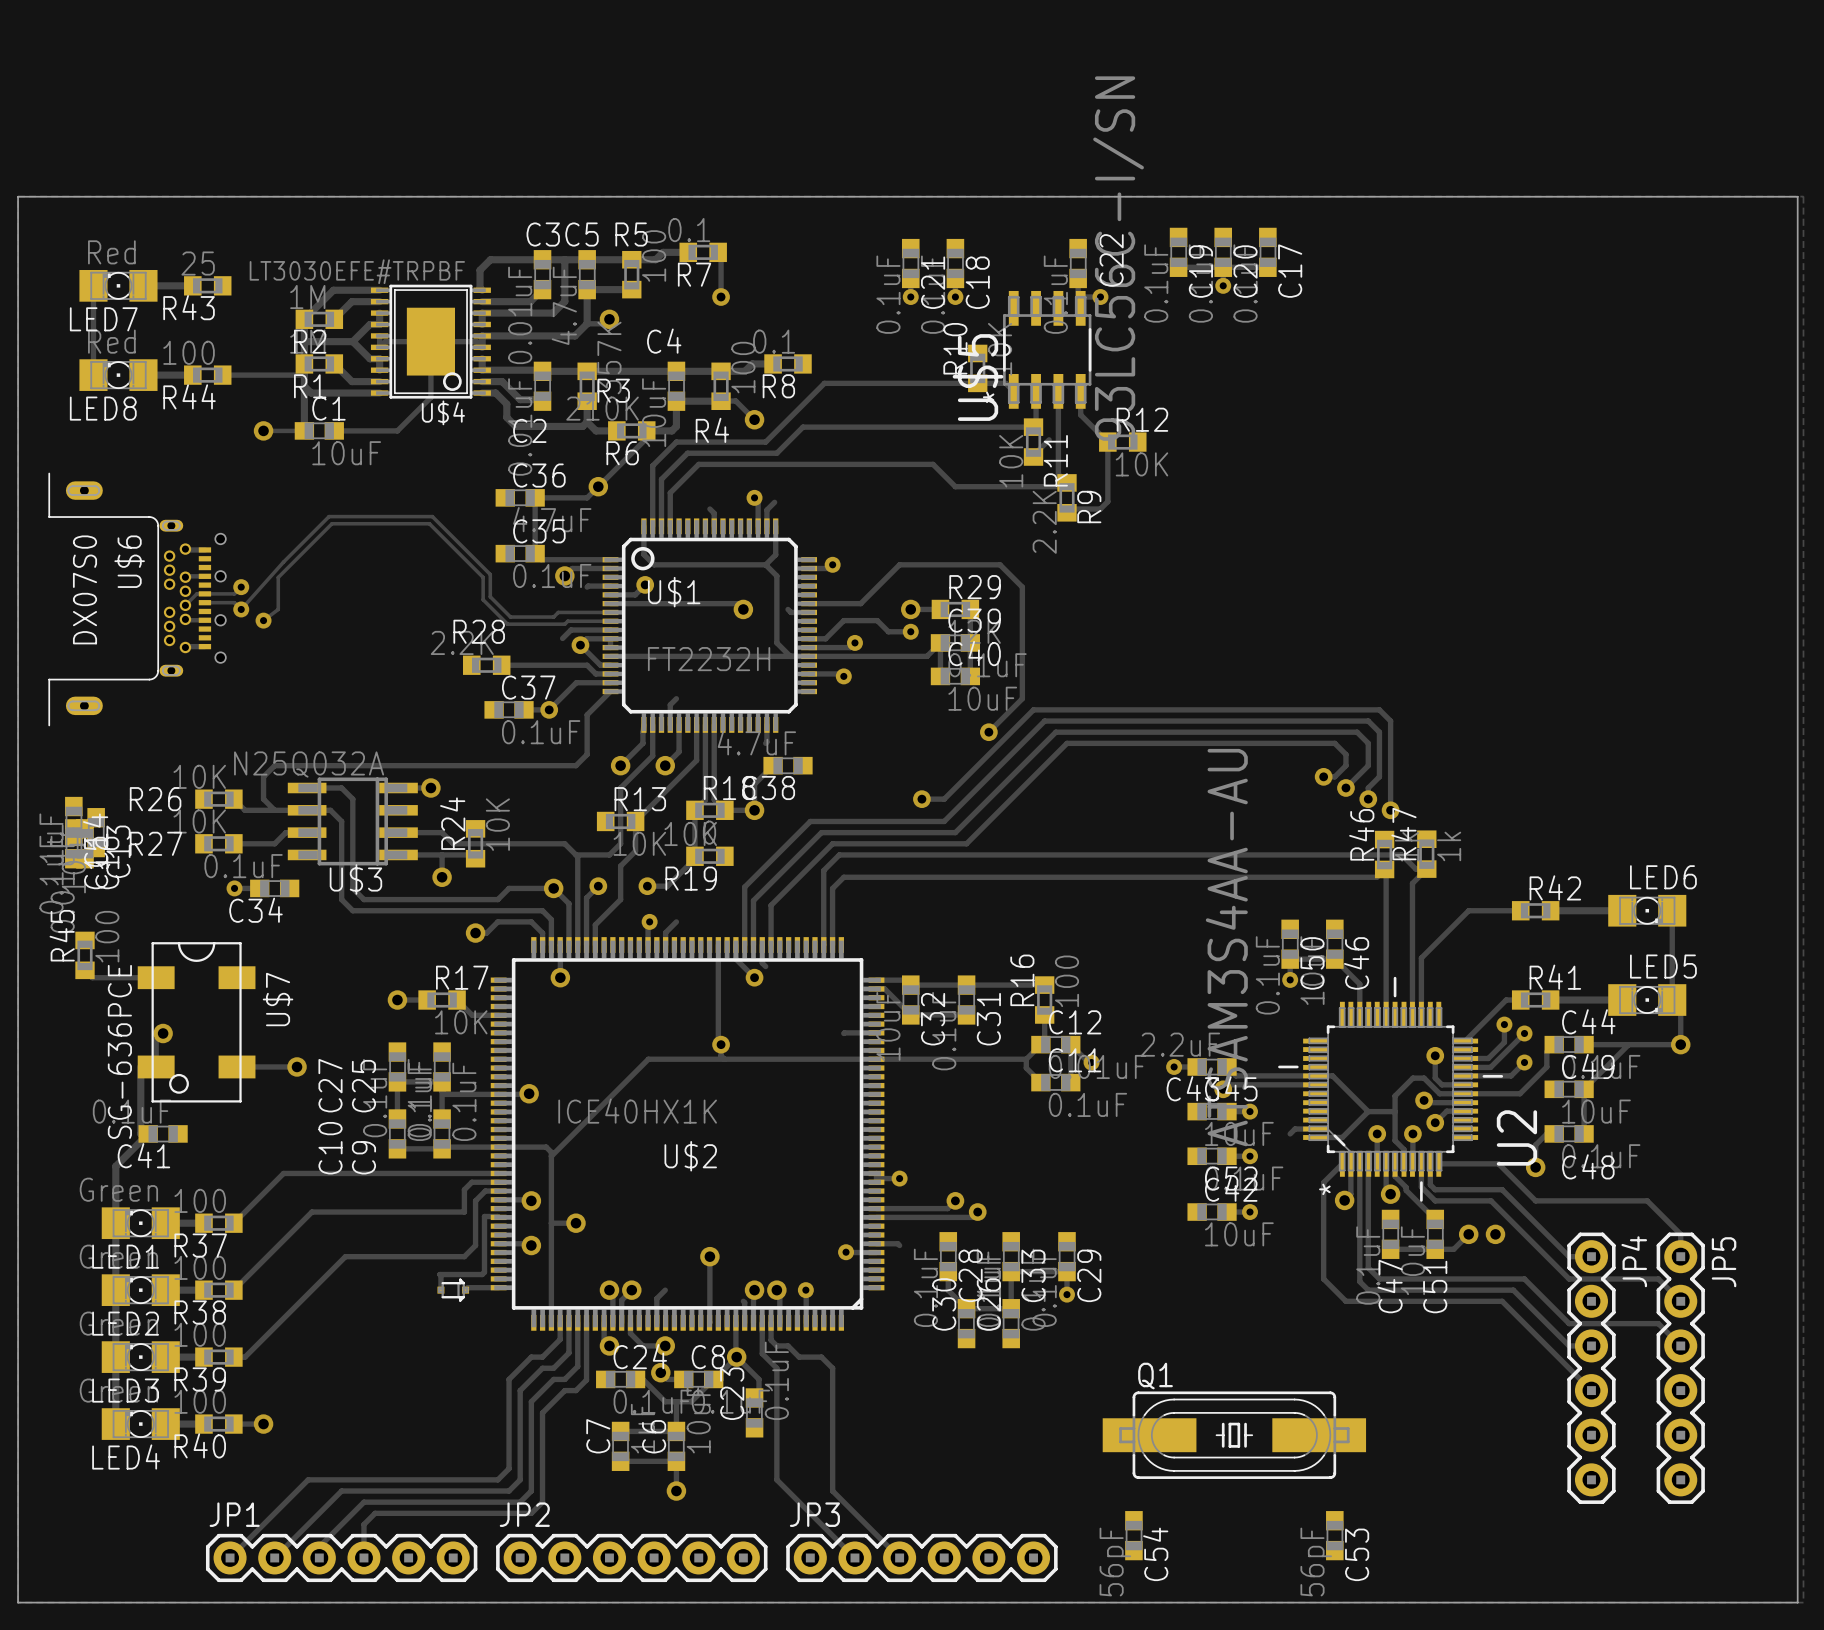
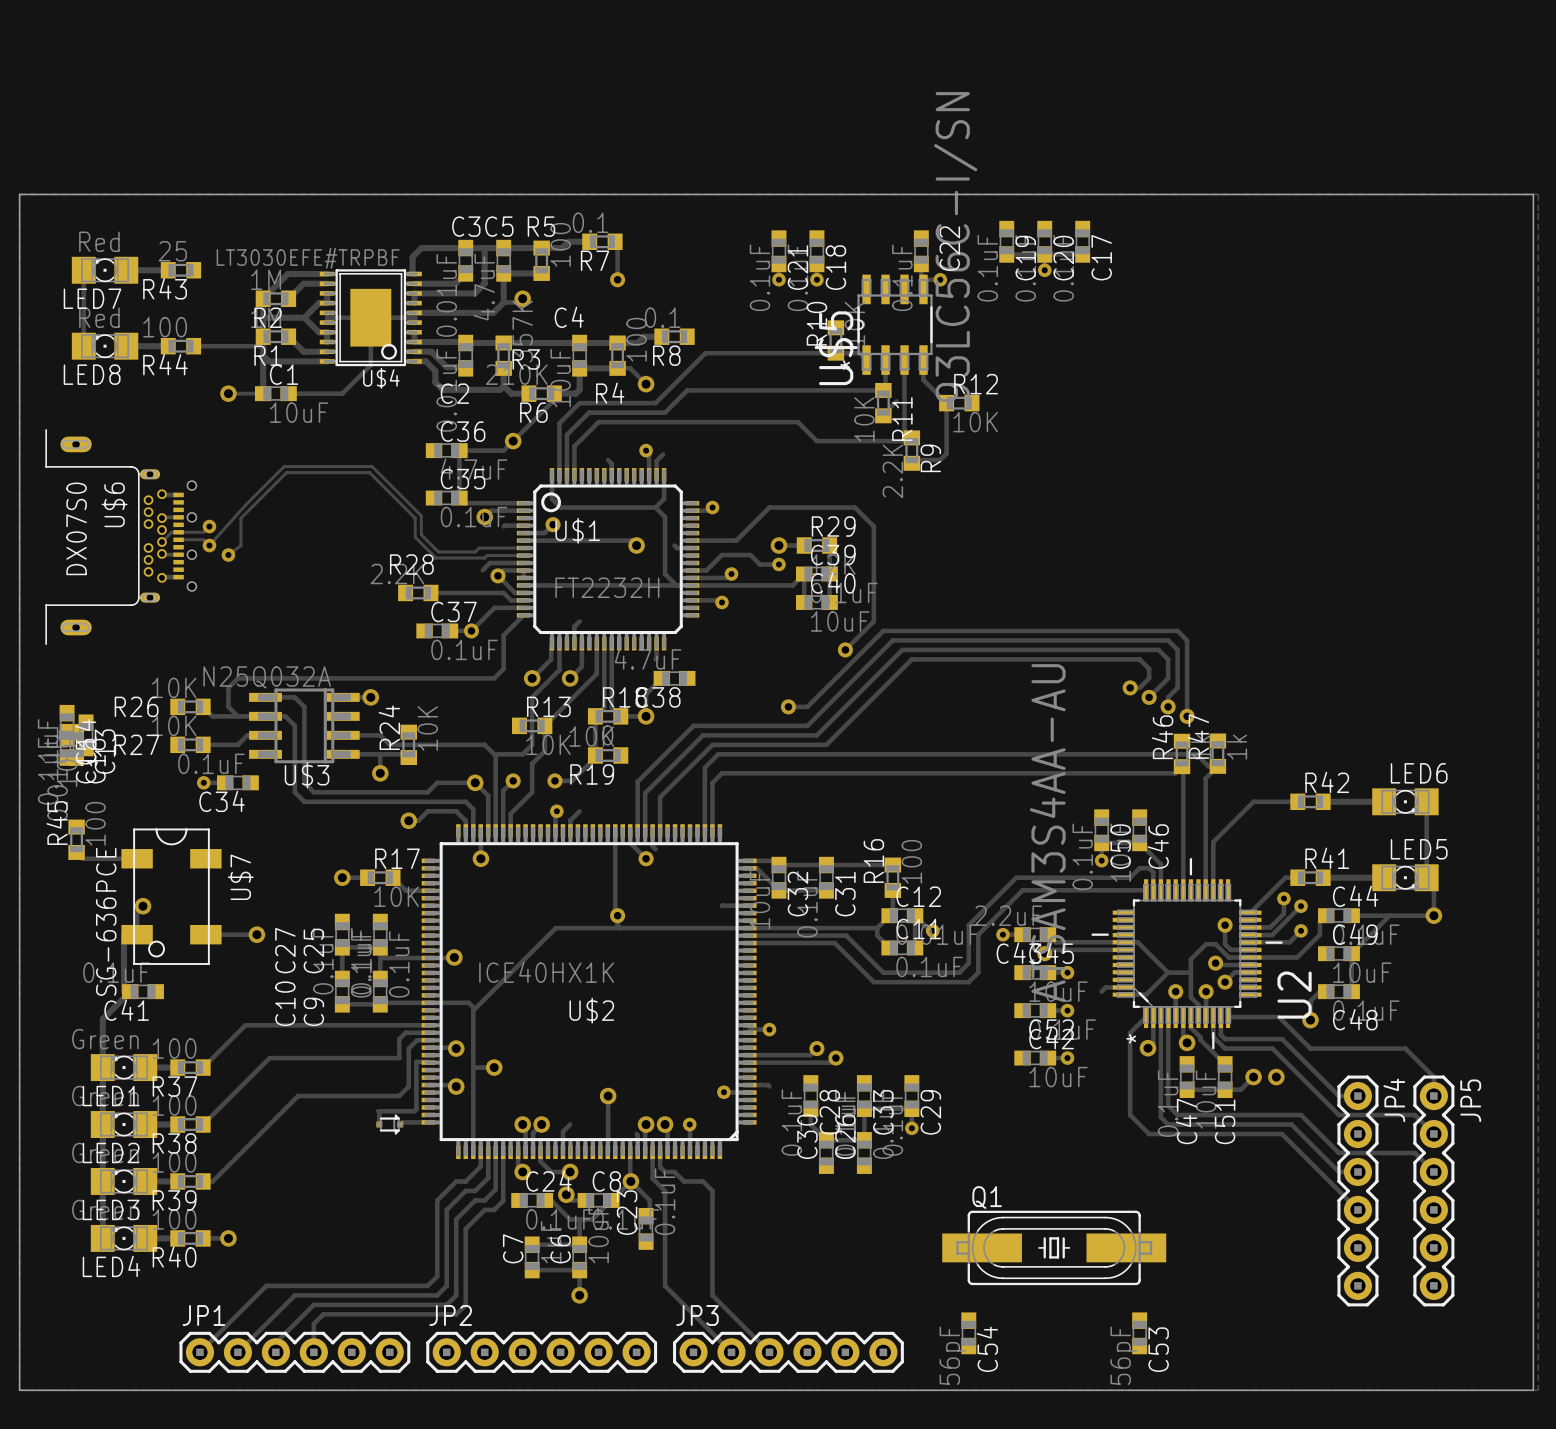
track: none -> (1146, 890) (1022, 890) (978, 934) (978, 972) (968, 982) (873, 982) (834, 943) (749, 943)
track: none -> (1153, 890) (1153, 872) (1149, 868) (1139, 868) (1130, 877) (1016, 877) (968, 925) (968, 963) (959, 972) (883, 972) (846, 935) (749, 935)

